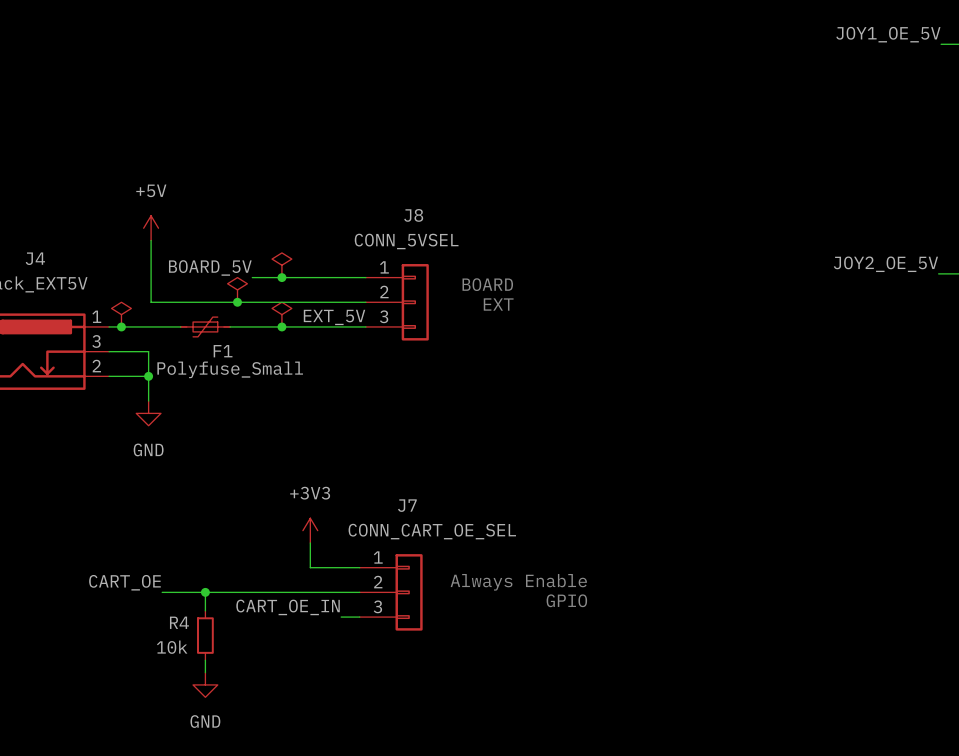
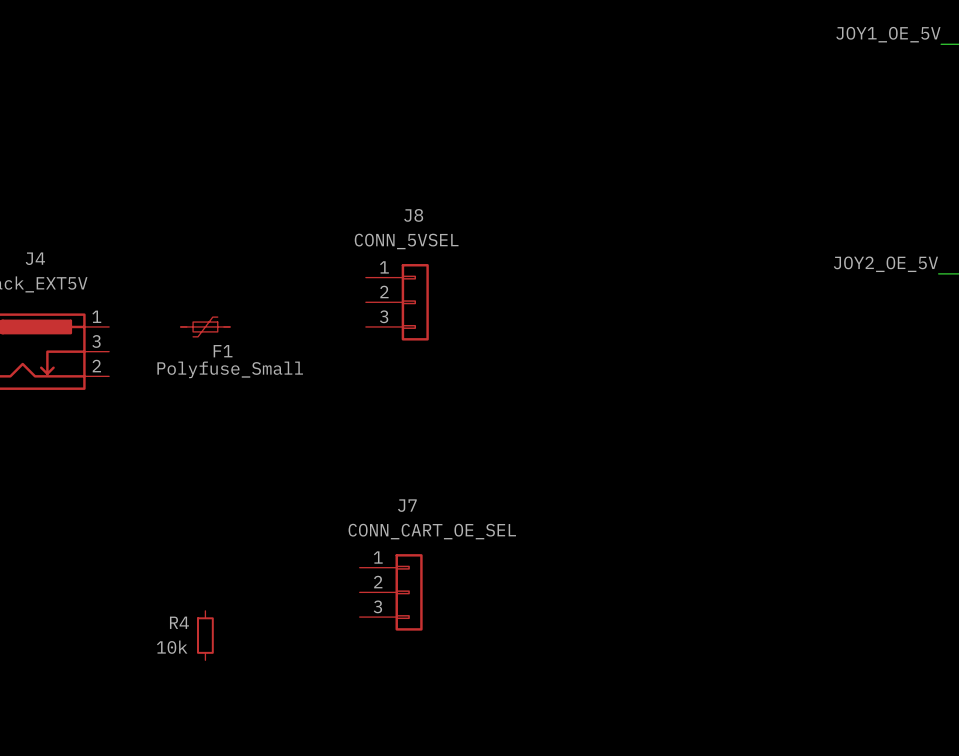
power symbol: +5V (151, 228) -> none
wire: (151, 240) (151, 302) (365, 302) -> none
power symbol: (281, 265) -> none
label: BOARD_5V (210, 267) -> none
wire: (252, 277) (365, 277) -> none
junction: (281, 277) -> none
text: BOARD (487, 284) -> none
power symbol: (237, 289) -> none
junction: (237, 302) -> none
text: EXT (498, 304) -> none
power symbol: (121, 314) -> none
power symbol: (281, 314) -> none
label: EXT_5V (334, 317) -> none
wire: (109, 326) (180, 326) -> none
junction: (121, 326) -> none
wire: (230, 326) (365, 326) -> none
junction: (281, 326) -> none
wire: (109, 351) (148, 351) (148, 401) -> none
wire: (109, 376) (148, 376) -> none
junction: (148, 376) -> none
power symbol: GND (148, 413) -> none
power symbol: +3V3 (310, 530) -> none
wire: (310, 542) (310, 567) (359, 567) -> none
label: CART_OE (124, 582) -> none
text: Always Enable (518, 582) -> none
wire: (162, 592) (359, 592) -> none
wire: (205, 592) (205, 610) -> none
junction: (205, 592) -> none
text: GPIO (566, 600) -> none
label: CART_OE_IN (288, 607) -> none
wire: (341, 617) (359, 617) -> none
wire: (205, 660) (205, 672) -> none
power symbol: GND (205, 684) -> none

